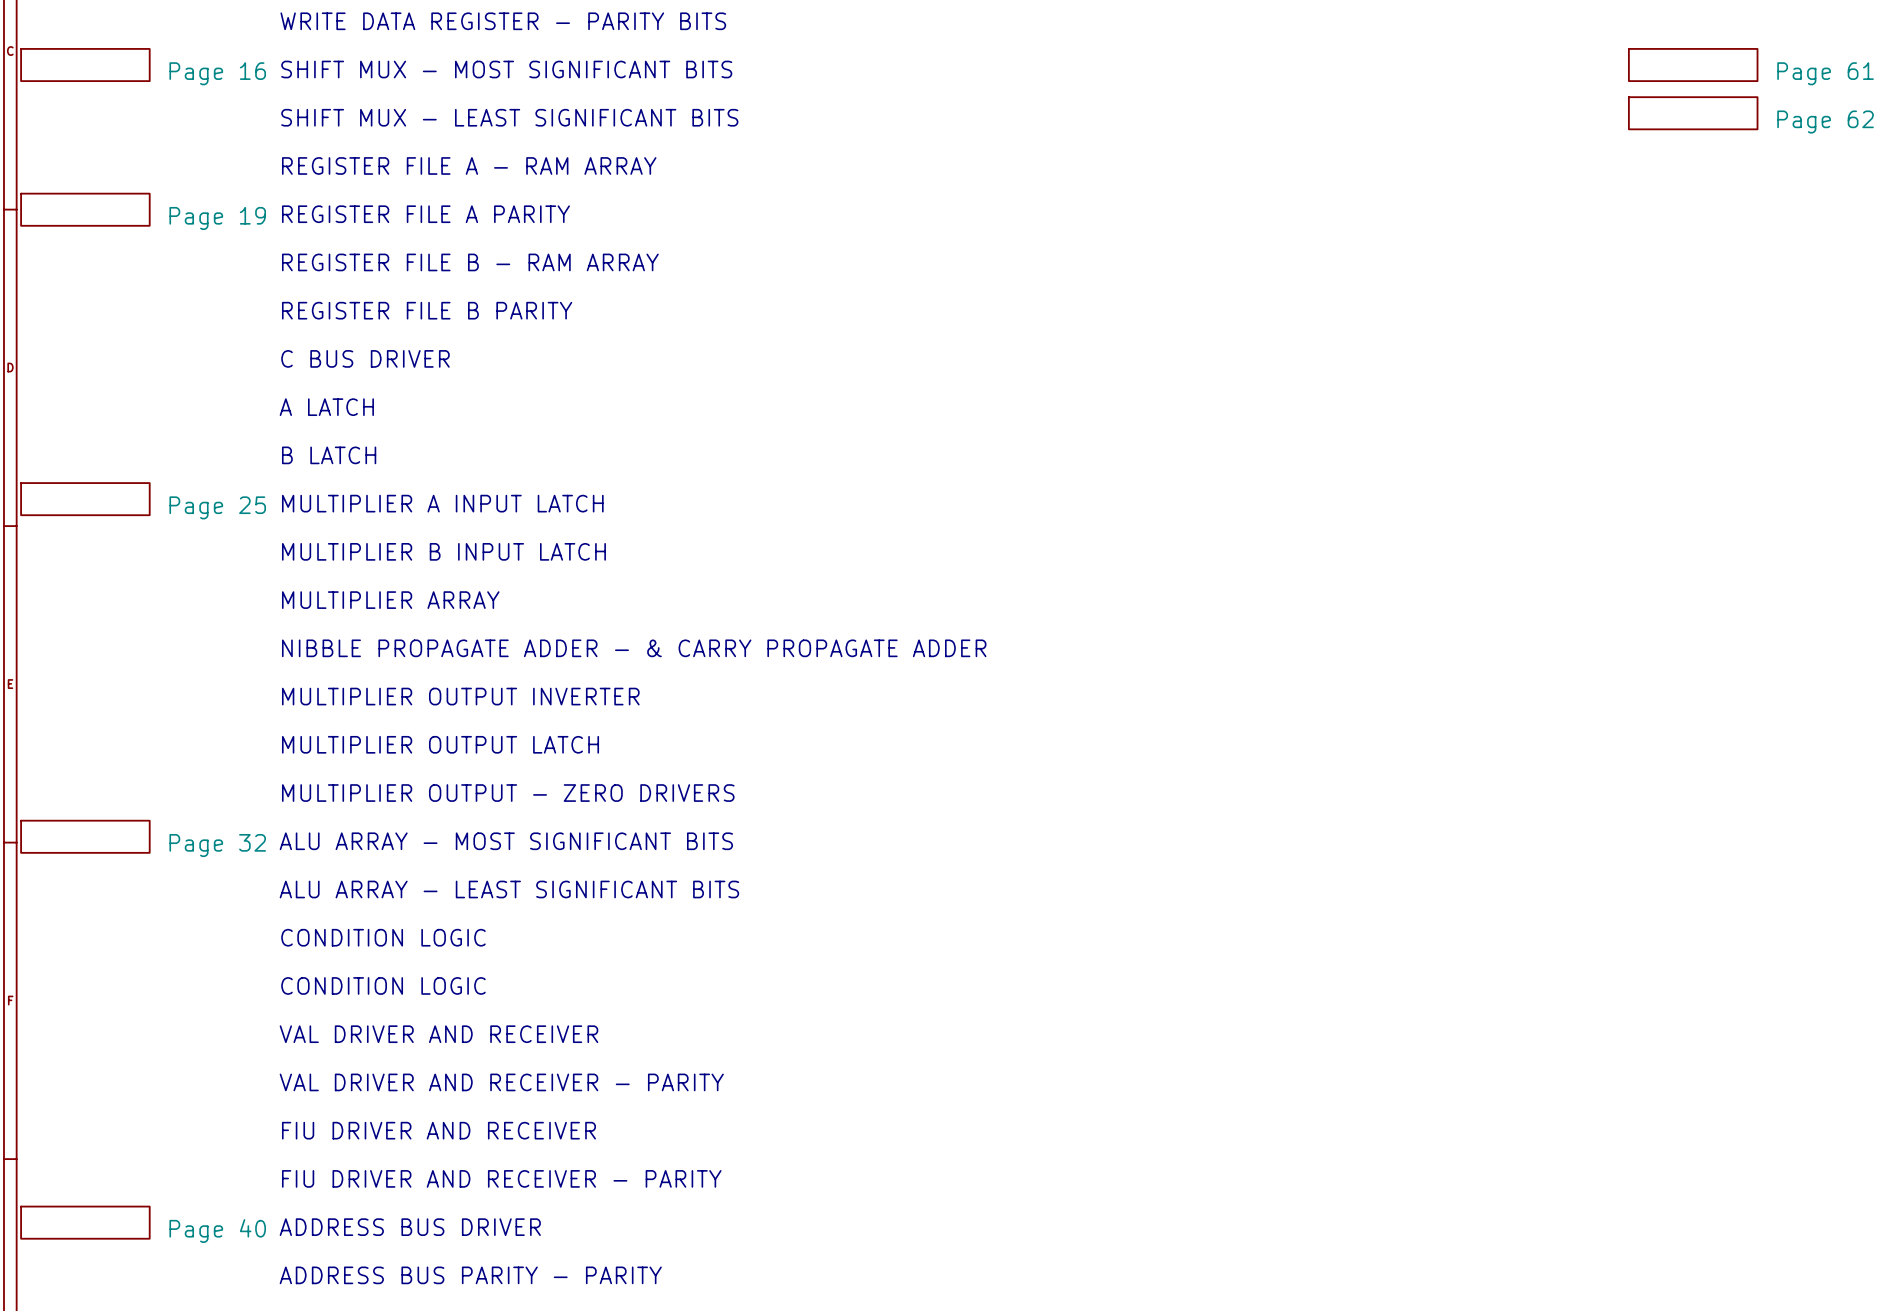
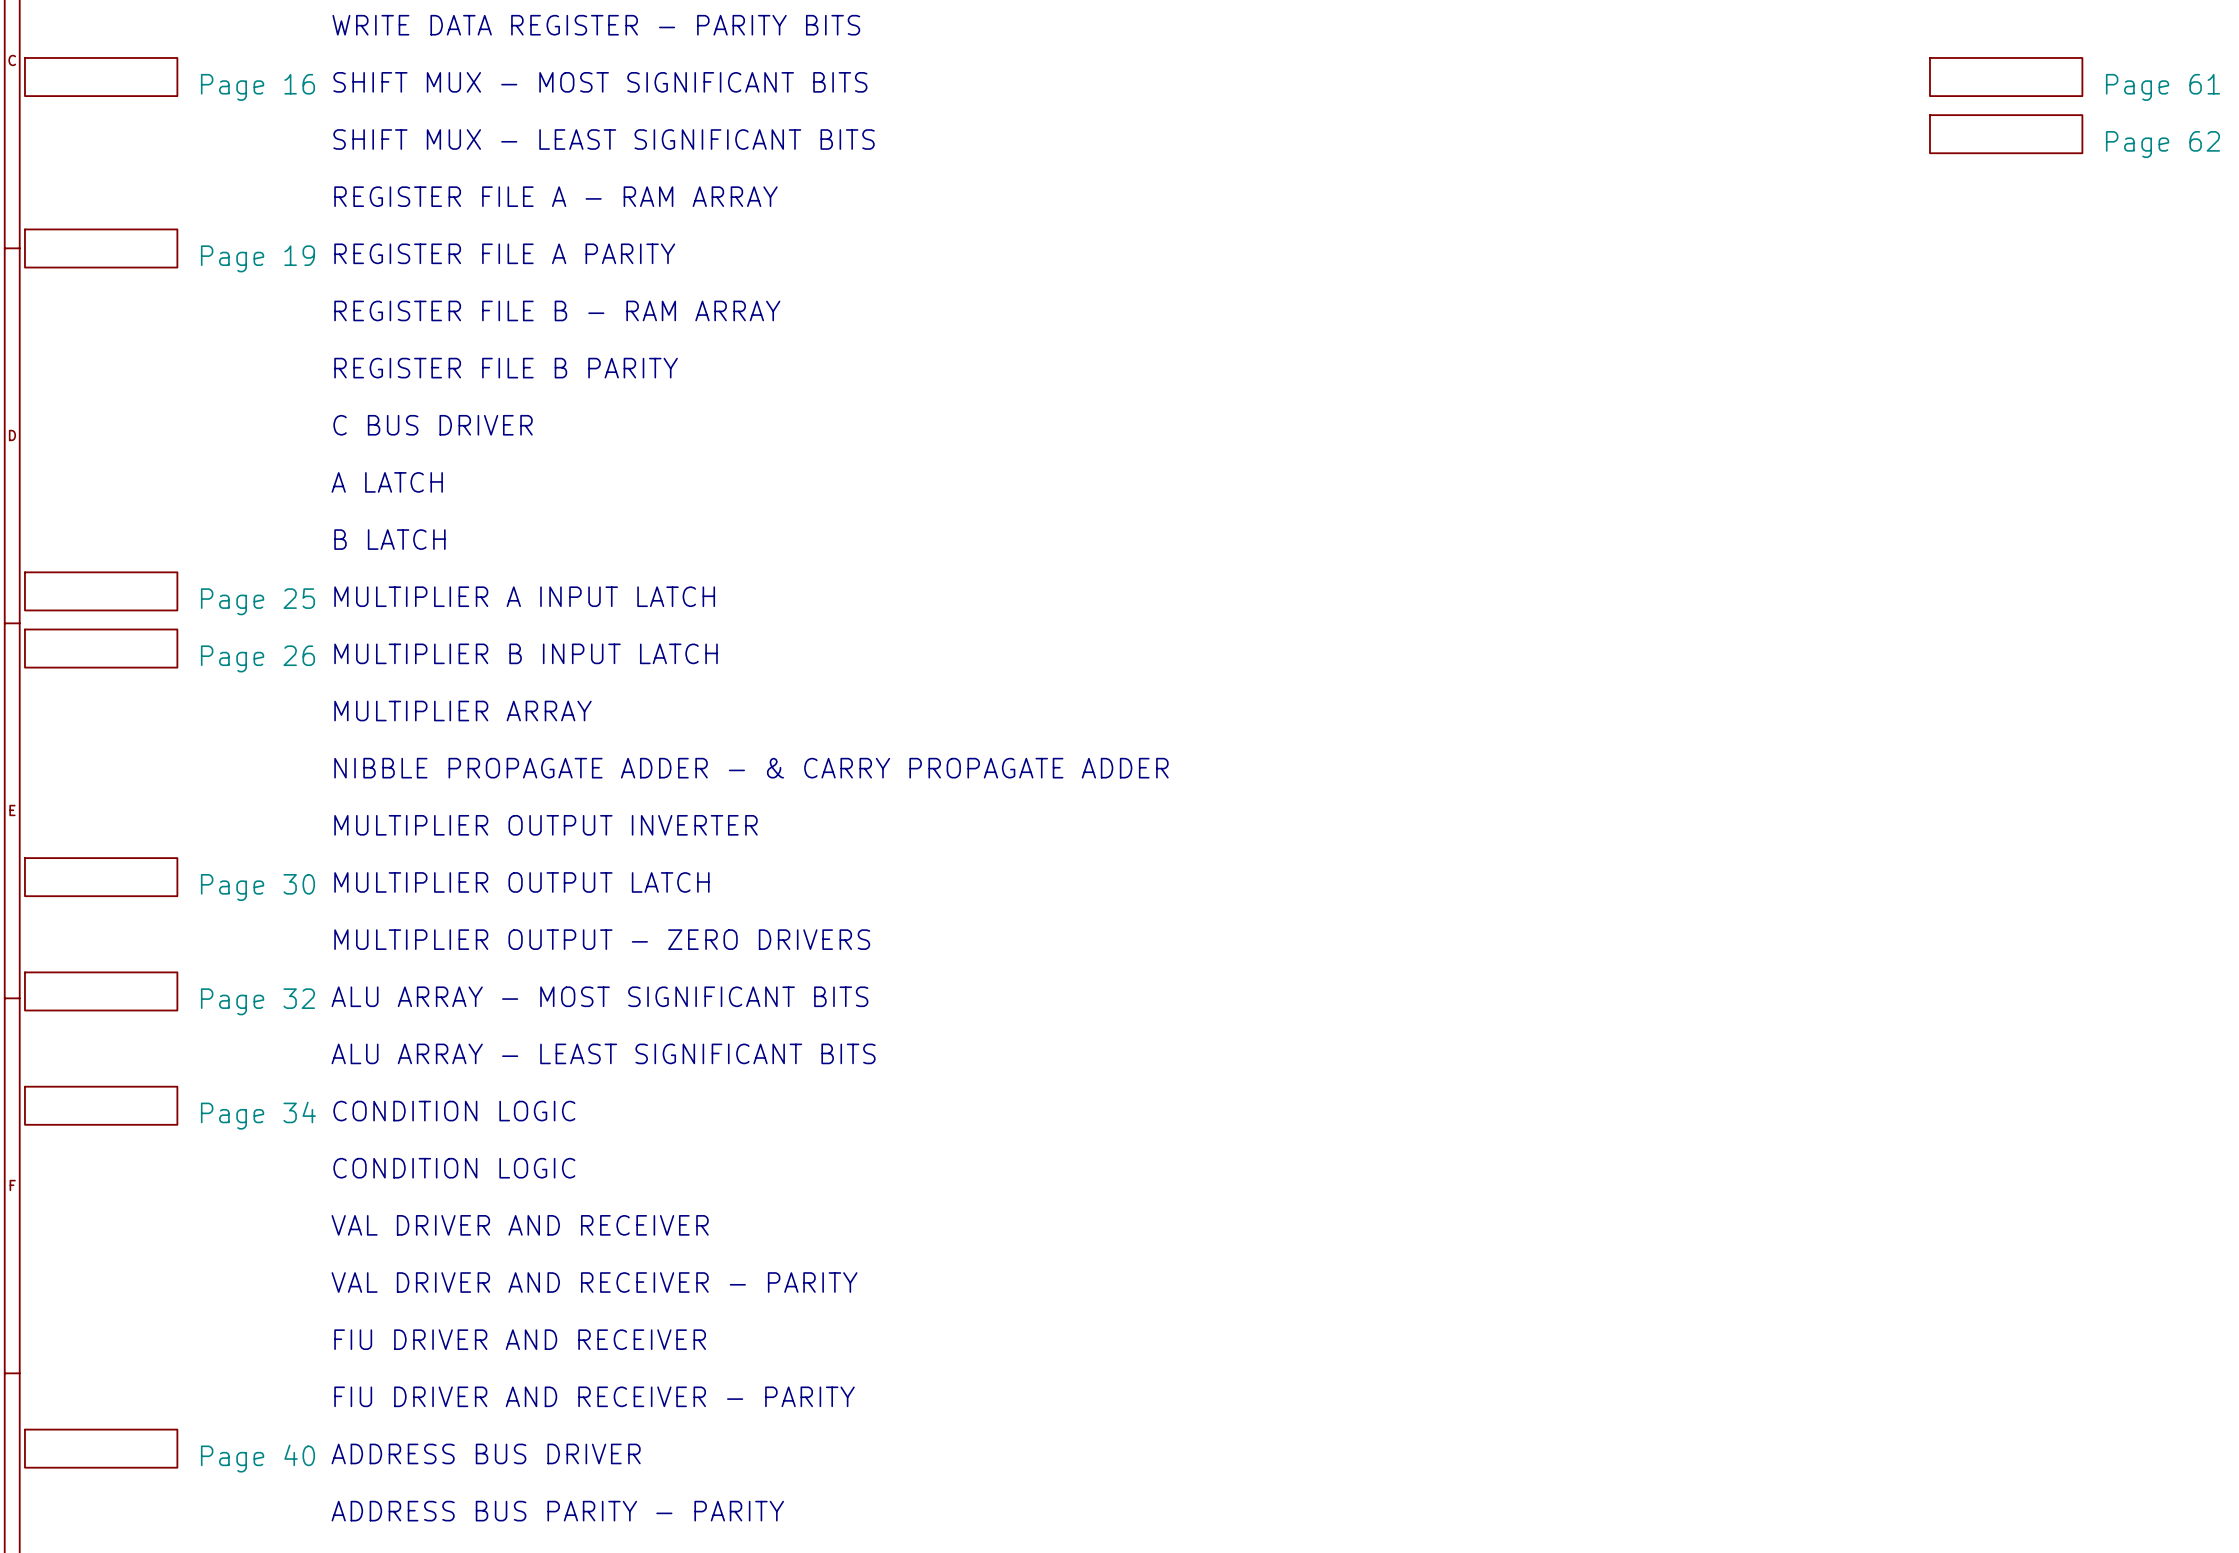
sheet Page 26: none -> (101, 648)
sheet Page 30: none -> (101, 877)
sheet Page 34: none -> (101, 1105)

